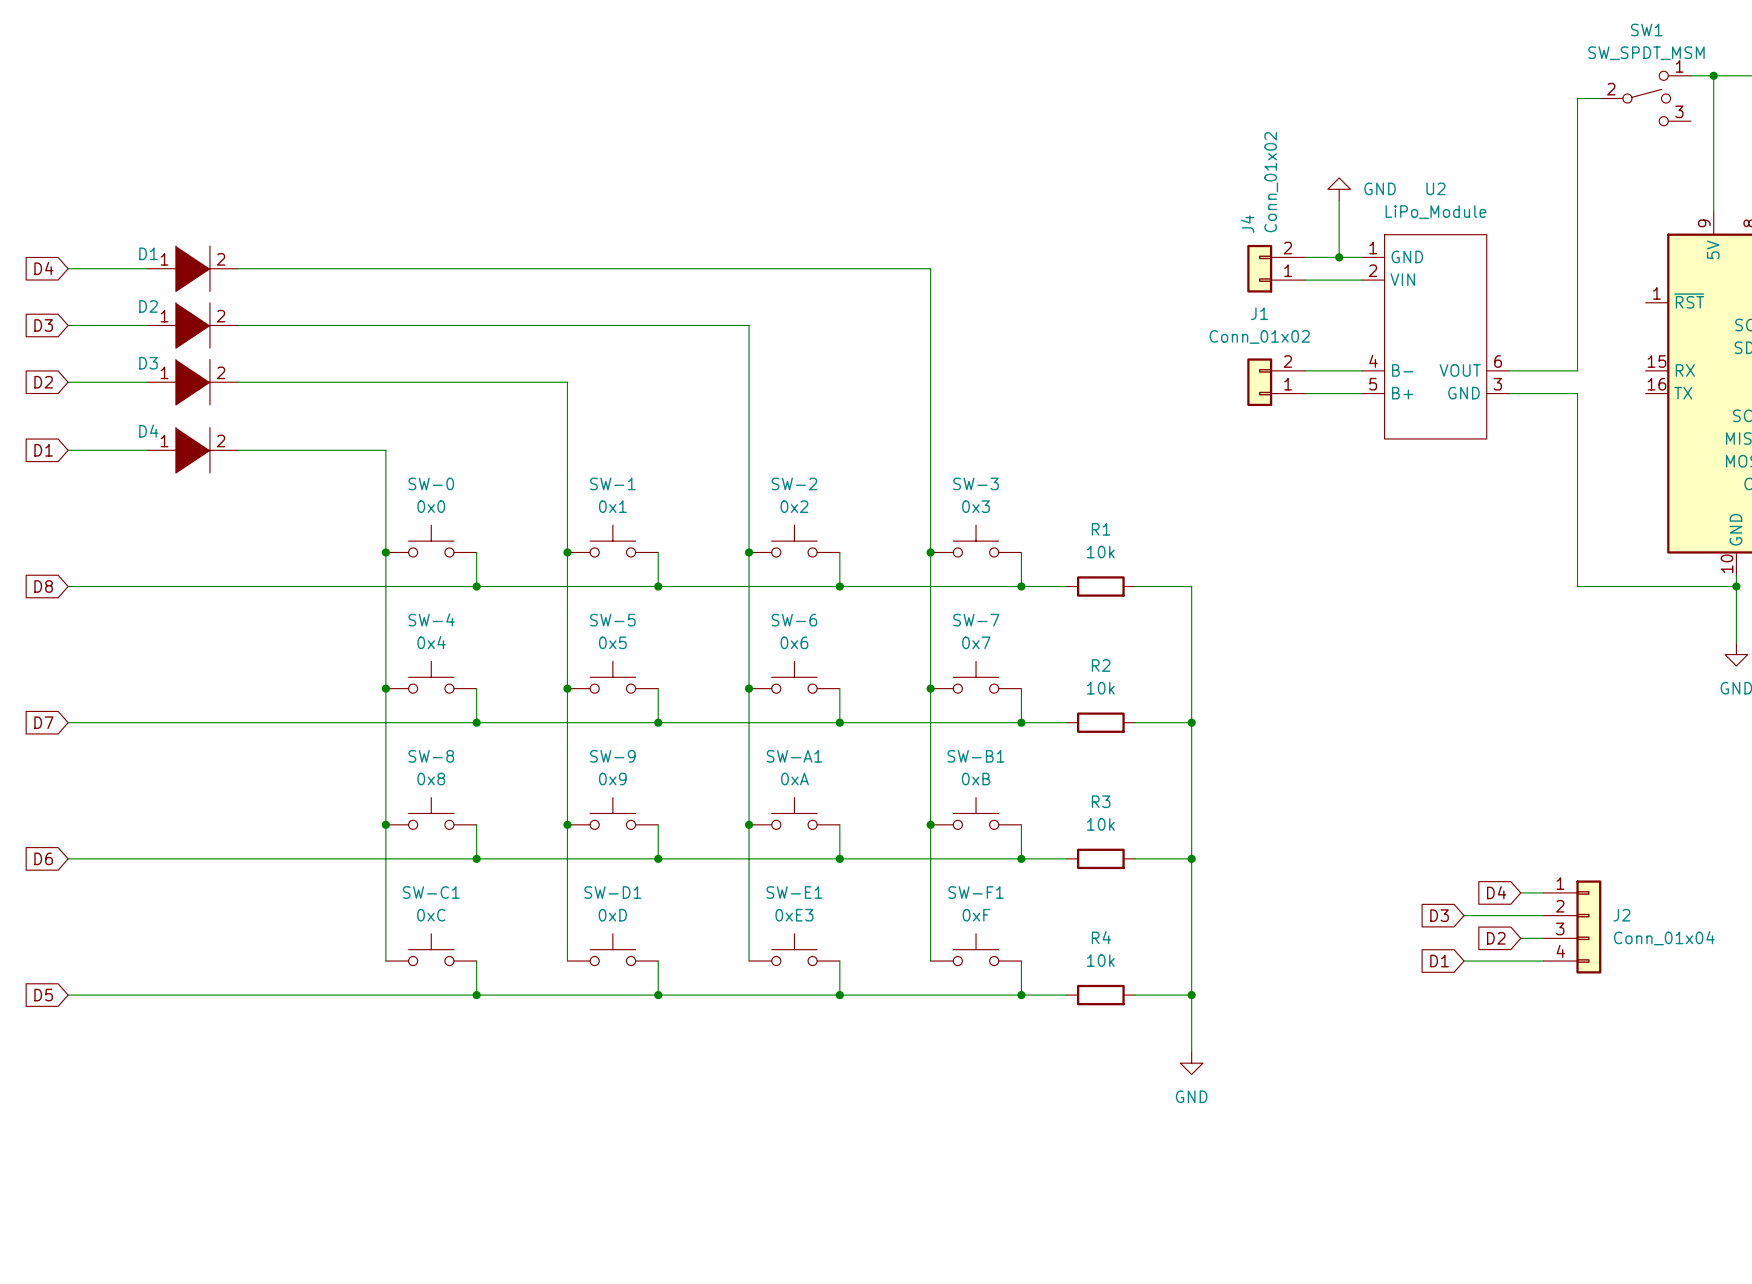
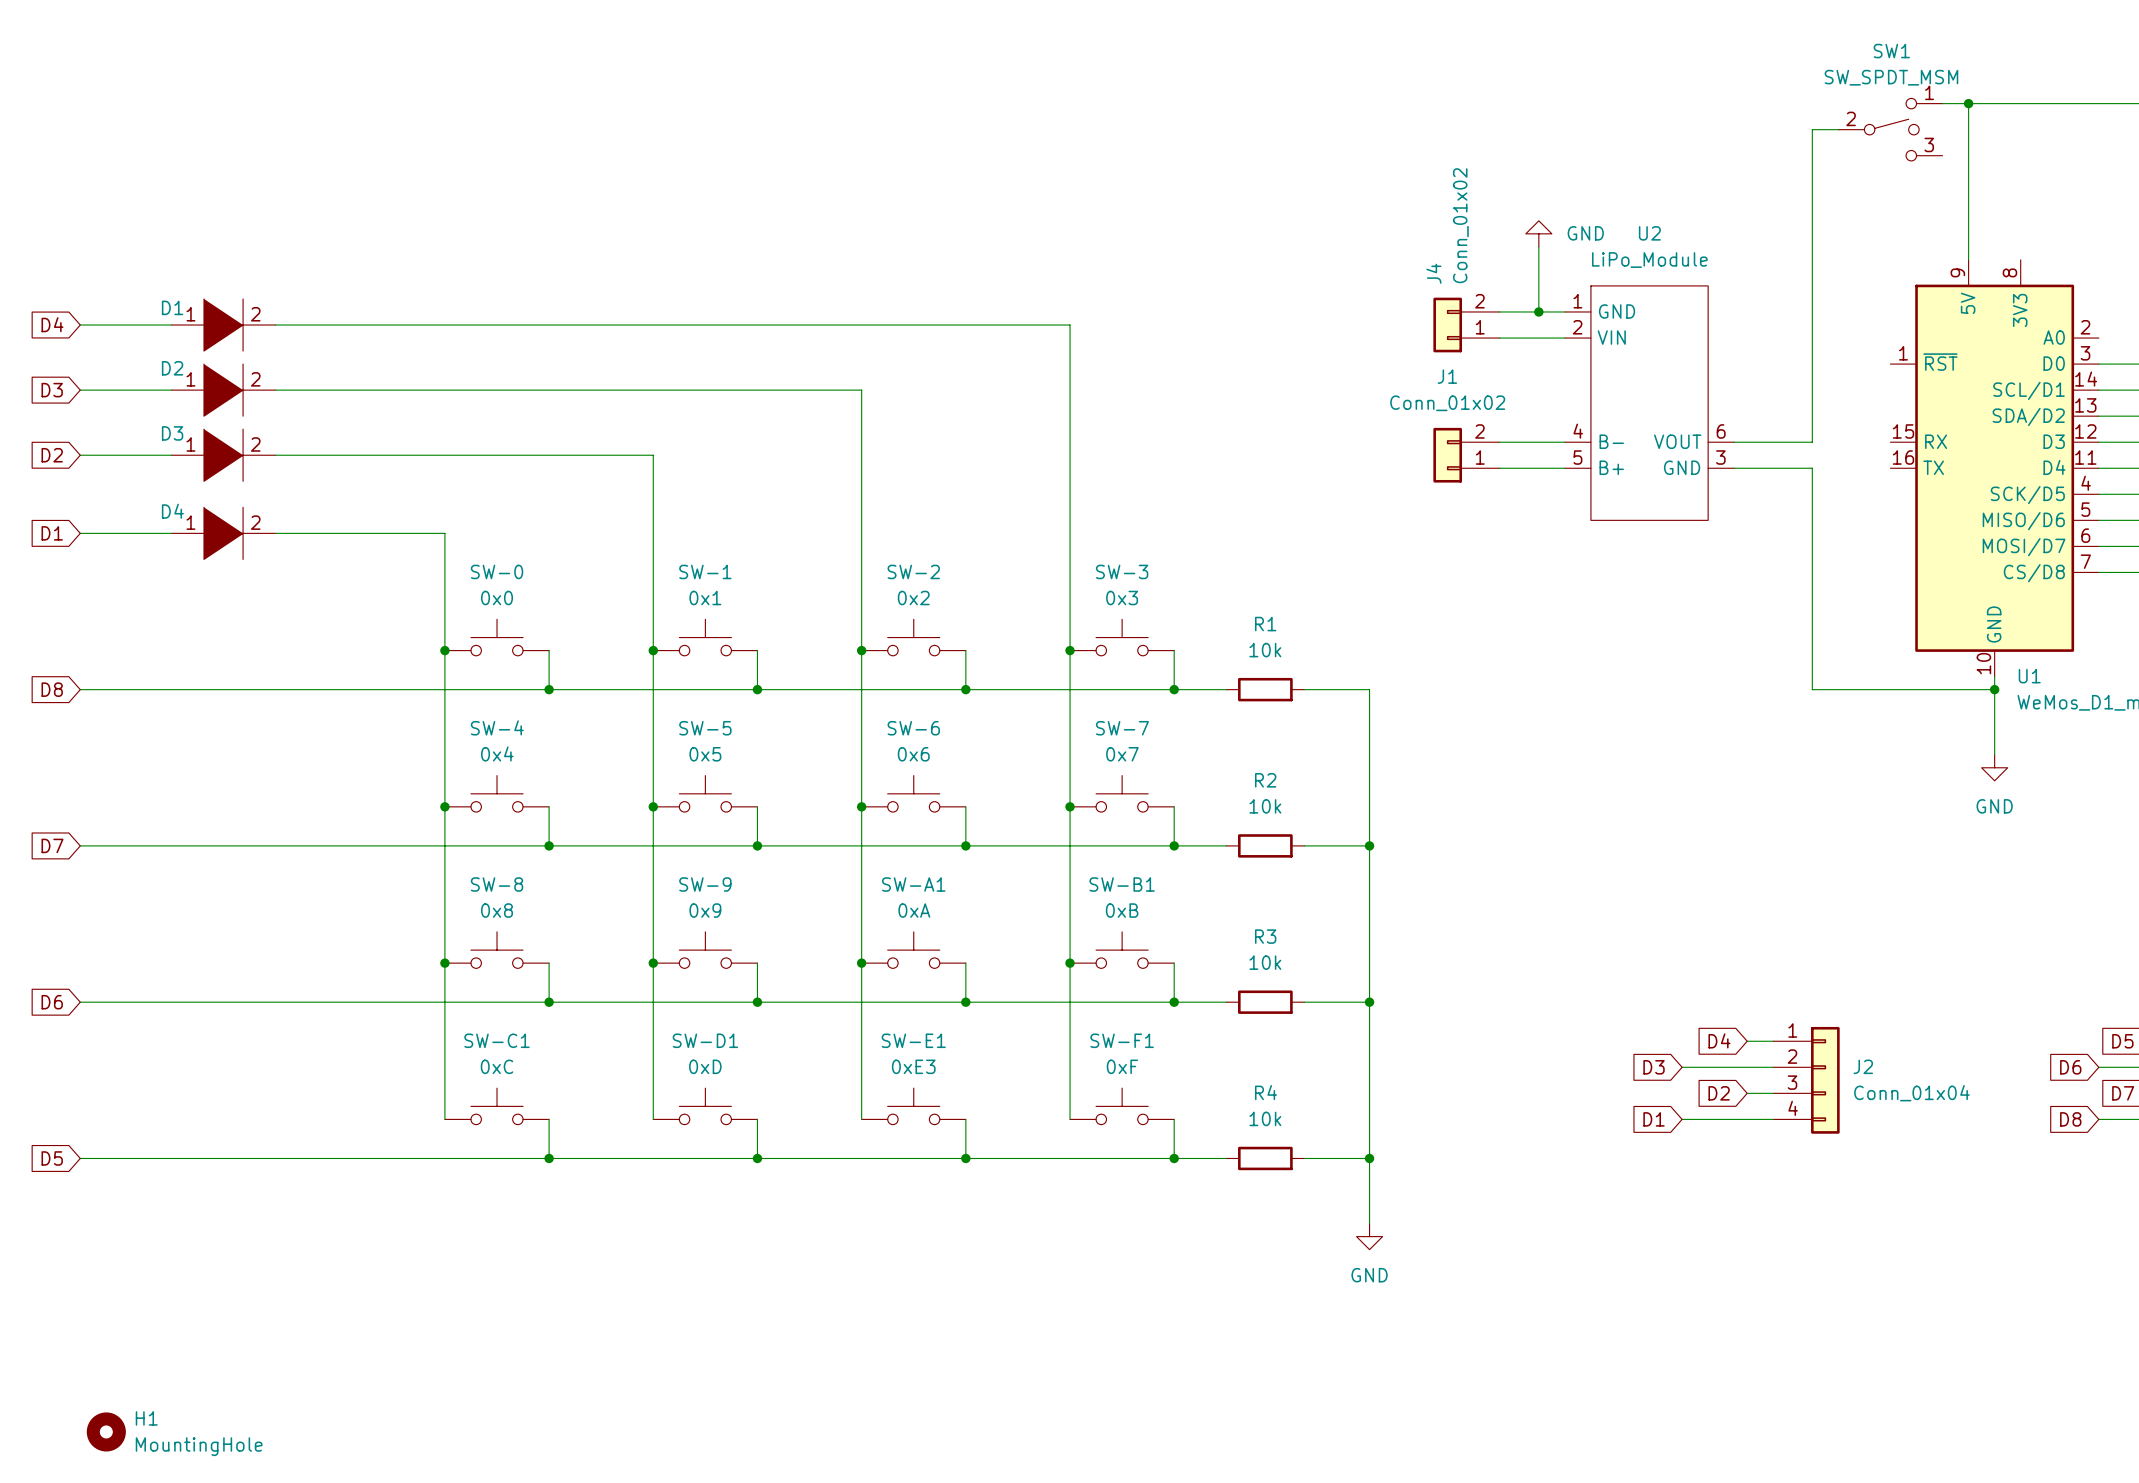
H1: none -> MountingHole (106, 1431)

